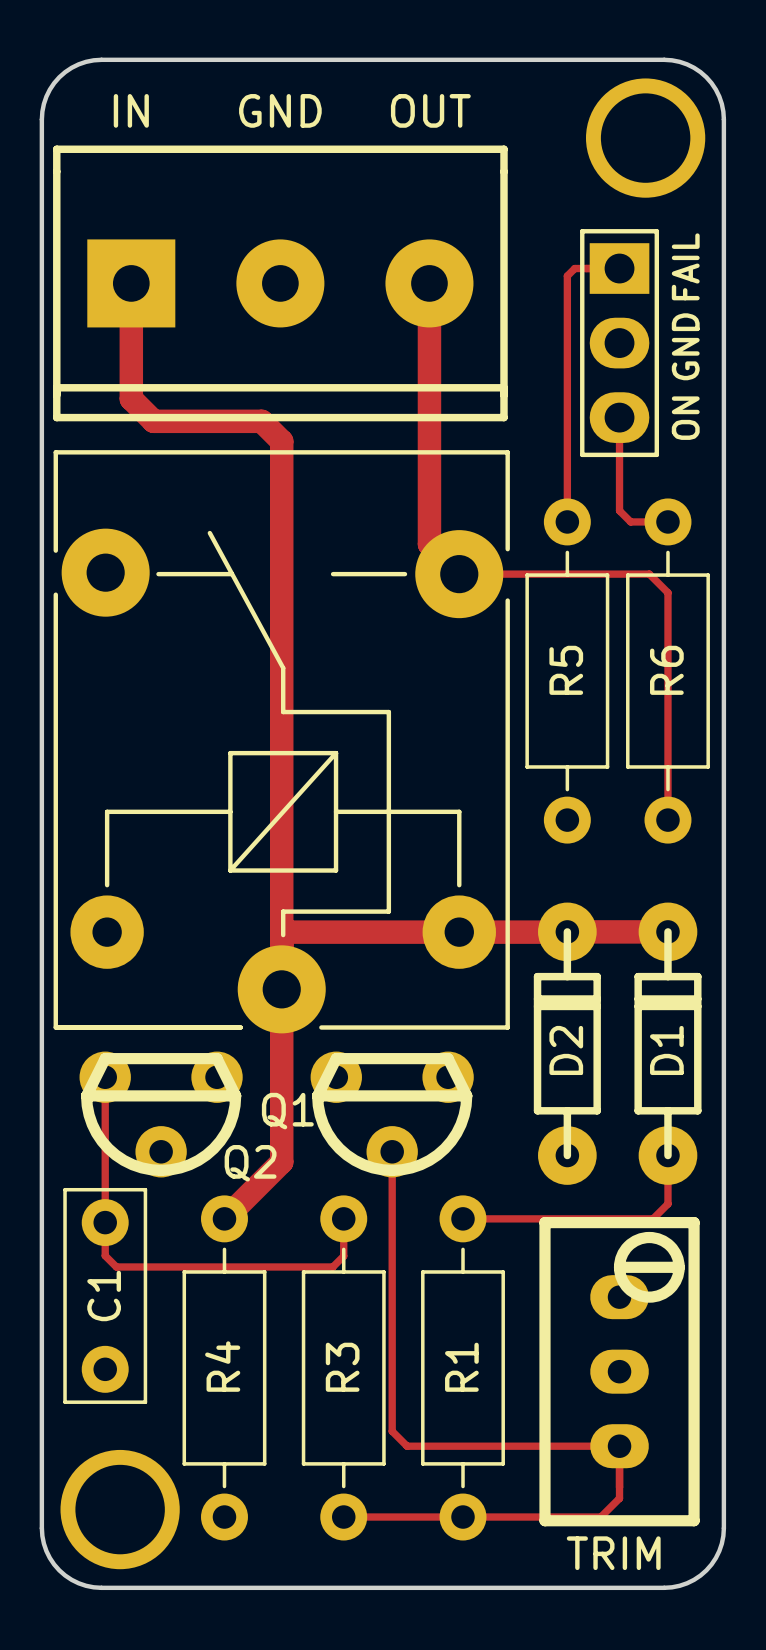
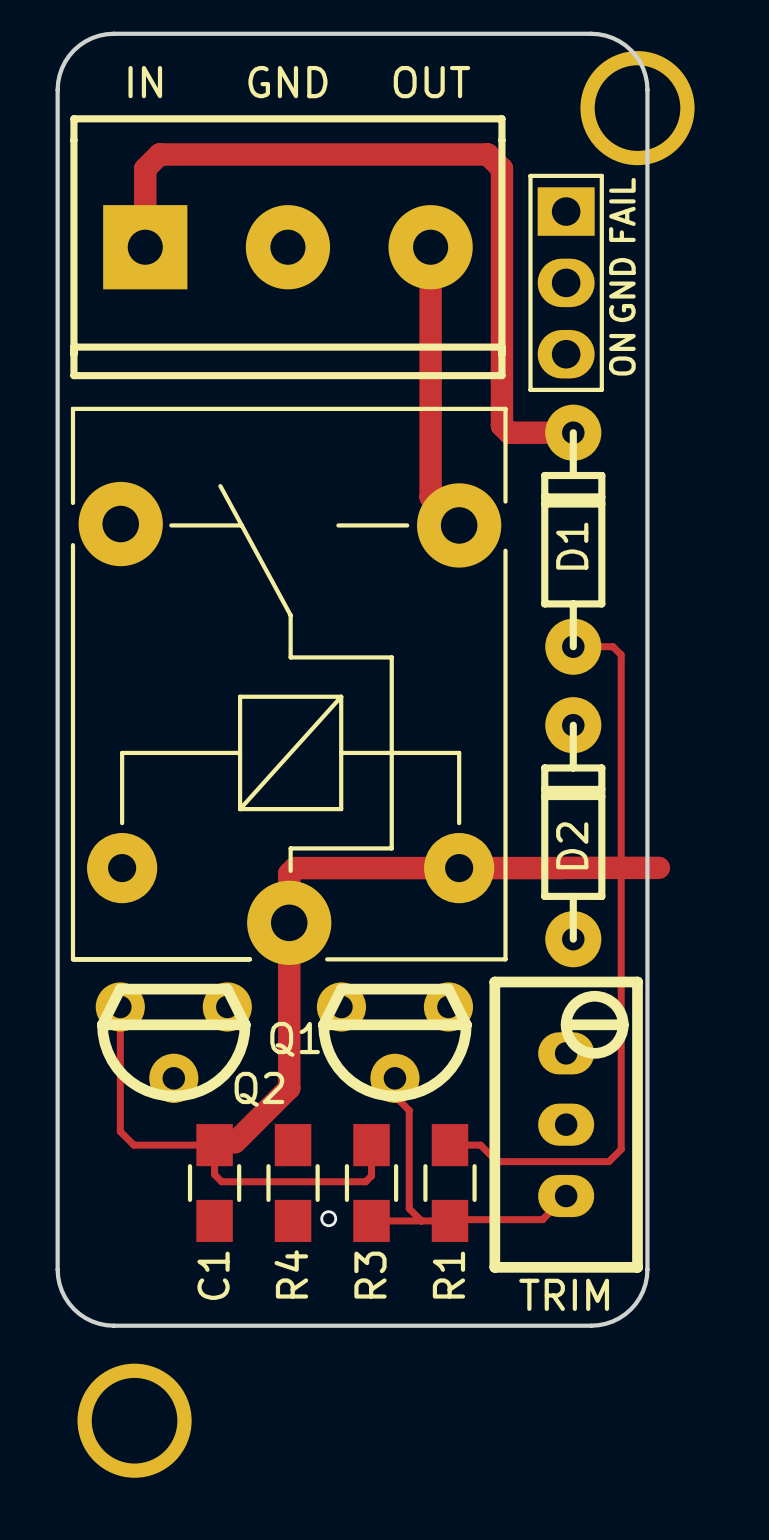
board edge: (101, 59) (664, 59) (679, 61) (694, 67) (711, 83) (719, 96) (723, 119) (723, 1528) (719, 1551) (711, 1564) (700, 1575) (687, 1583) (664, 1587) (101, 1587) (86, 1585) (71, 1579) (54, 1564) (46, 1551) (41, 1528) (41, 119) (46, 96) (59, 77) (78, 64) (101, 59) -> (113, 33) (92, 38) (74, 50) (61, 68) (57, 89) (57, 1269) (61, 1291) (74, 1309) (85, 1318) (99, 1323) (113, 1325) (591, 1325) (612, 1321) (625, 1314) (635, 1303) (643, 1291) (647, 1269) (647, 89) (643, 68) (630, 50) (619, 41) (605, 35) (591, 33) (113, 33)
text position: FAIL (685, 266) -> FAIL (622, 209)
track: (619, 268) (574, 268) (567, 275) (567, 521) -> none
track: (131, 283) (131, 398) (153, 421) (261, 421) (281, 441) (281, 938) -> (145, 247) (145, 168) (159, 154) (487, 154) (501, 168) (501, 425) (509, 432) (573, 432)
part position: (619, 343) -> (566, 282)
text position: GND (685, 346) -> GND (622, 290)
track: (619, 417) (619, 510) (630, 521) (667, 521) -> none
text position: ON (685, 418) -> ON (622, 354)
track: (459, 574) (649, 574) (667, 592) (667, 820) -> none
R5: (567, 671) -> none
R6: (667, 671) -> none
track: none -> (573, 646) (612, 646) (621, 654) (621, 1149) (608, 1161) (497, 1161) (480, 1145) (450, 1145)
D2 position: (567, 1043) -> (573, 832)
D1 position: (667, 1043) -> (573, 539)
D2 name position: D2 (566, 1050) -> D2 (572, 845)
track: (667, 1155) (667, 1203) (653, 1218) (463, 1218) -> none
track: (392, 1170) (392, 1431) (407, 1446) (619, 1446) (619, 1498) (600, 1517) (463, 1517) -> (394, 1096) (409, 1110) (409, 1208) (421, 1220)
C1 footprint: [63, 1187, 148, 1404] -> [187, 1124, 242, 1243]
R4 footprint: [182, 1195, 267, 1541] -> [266, 1124, 320, 1243]
R3 footprint: [301, 1195, 386, 1541] -> [344, 1124, 399, 1243]
R1 footprint: [421, 1195, 505, 1541] -> [423, 1124, 477, 1243]
track: (105, 1207) (105, 1255) (116, 1266) (332, 1266) (343, 1256) (343, 1218) -> (120, 1131) (133, 1145) (214, 1145) (214, 1174) (221, 1181) (365, 1181) (371, 1175) (371, 1145)
track: none -> (566, 1196) (542, 1219) (452, 1219)
C1 name position: C1 (104, 1295) -> C1 (213, 1275)
via: none -> (328, 1218)
track: none -> (371, 1220) (450, 1220)
R4 name position: R4 (222, 1366) -> R4 (291, 1274)
R3 name position: R3 (342, 1367) -> R3 (370, 1275)
R1 name position: R1 (461, 1367) -> R1 (448, 1275)
part position: (619, 1371) -> (566, 1124)
track: (340, 1517) (440, 1517) -> none
text position: TRIM (613, 1553) -> TRIM (564, 1294)

